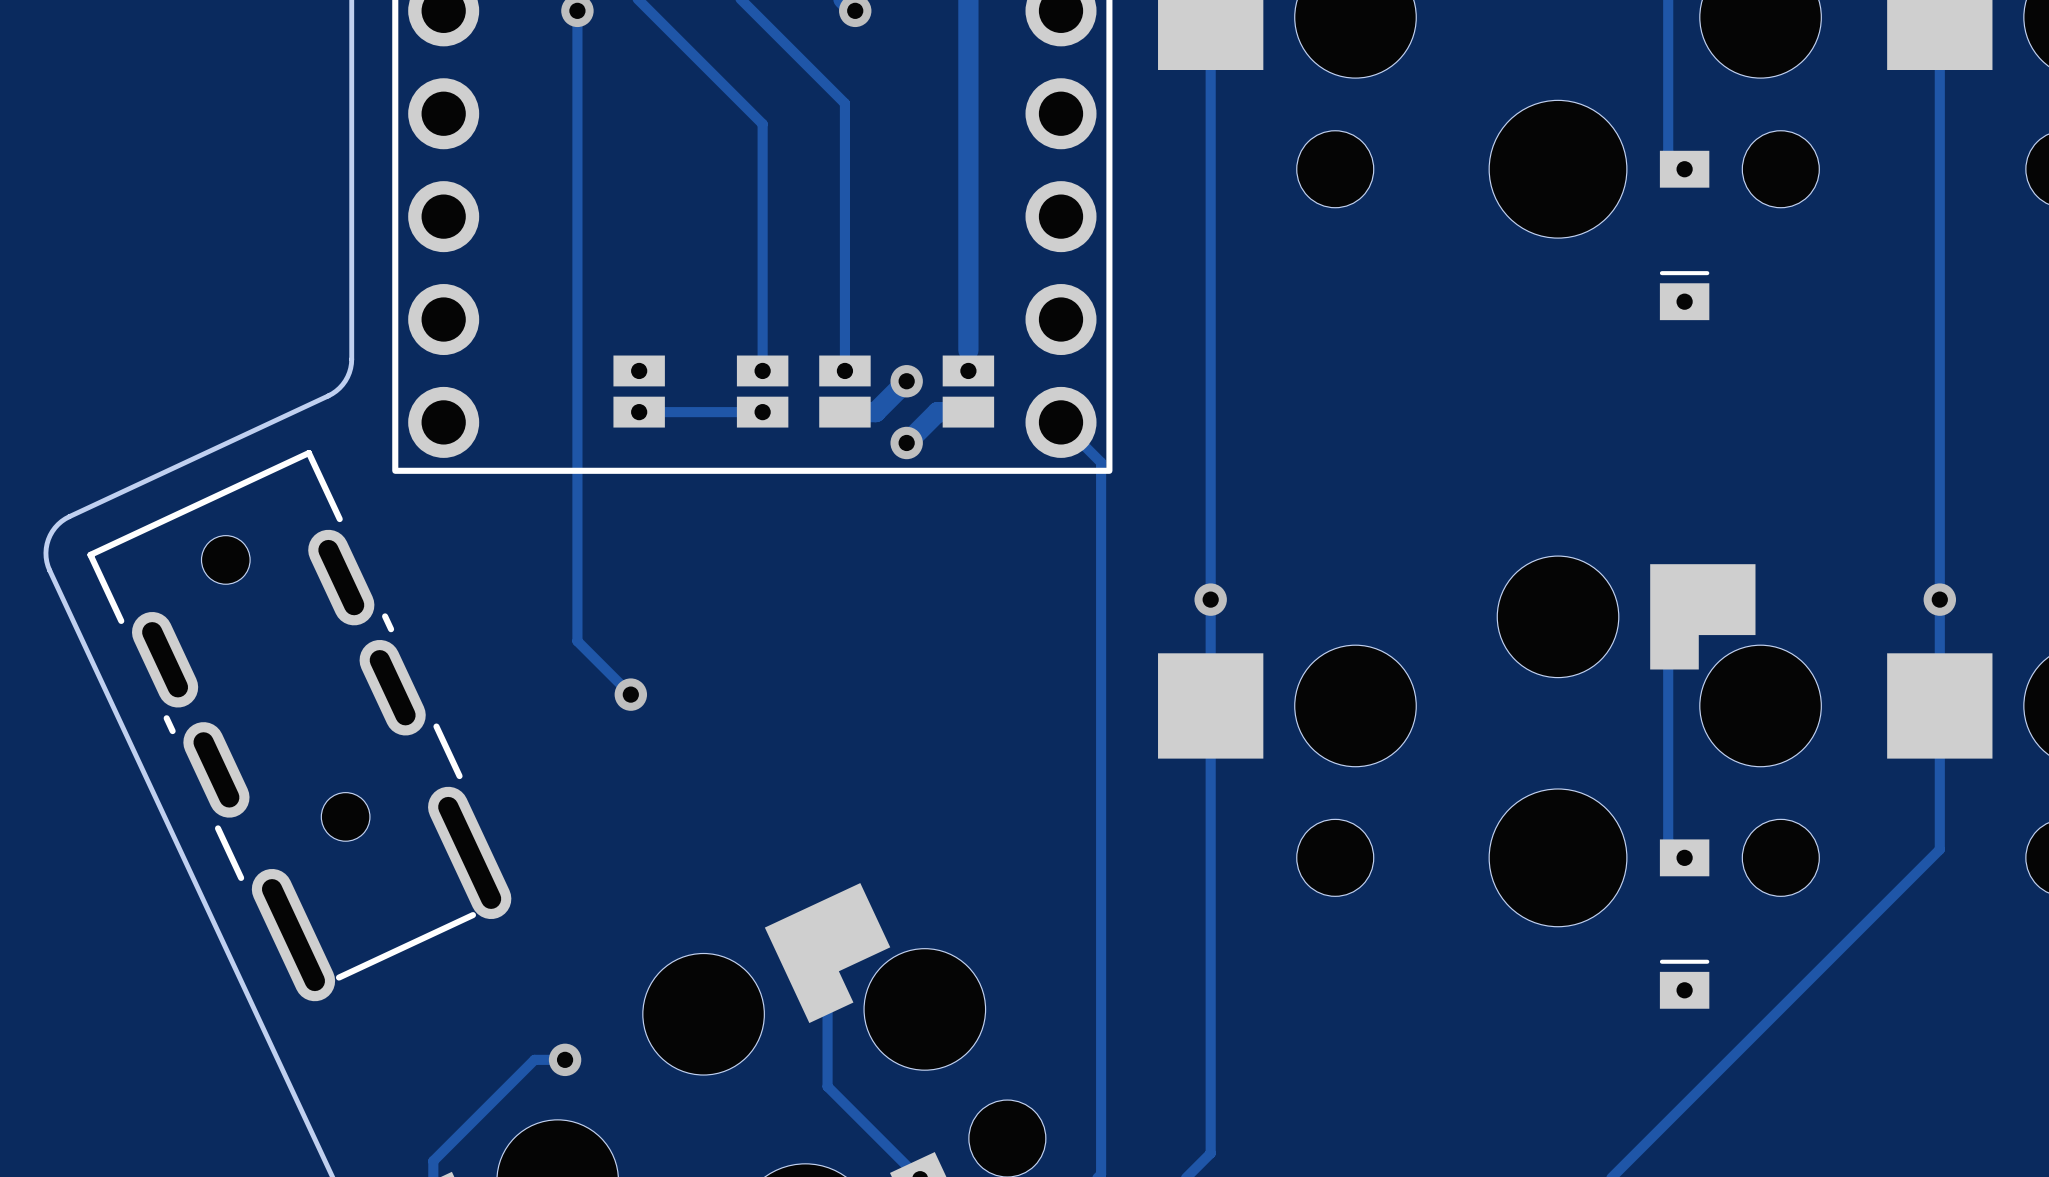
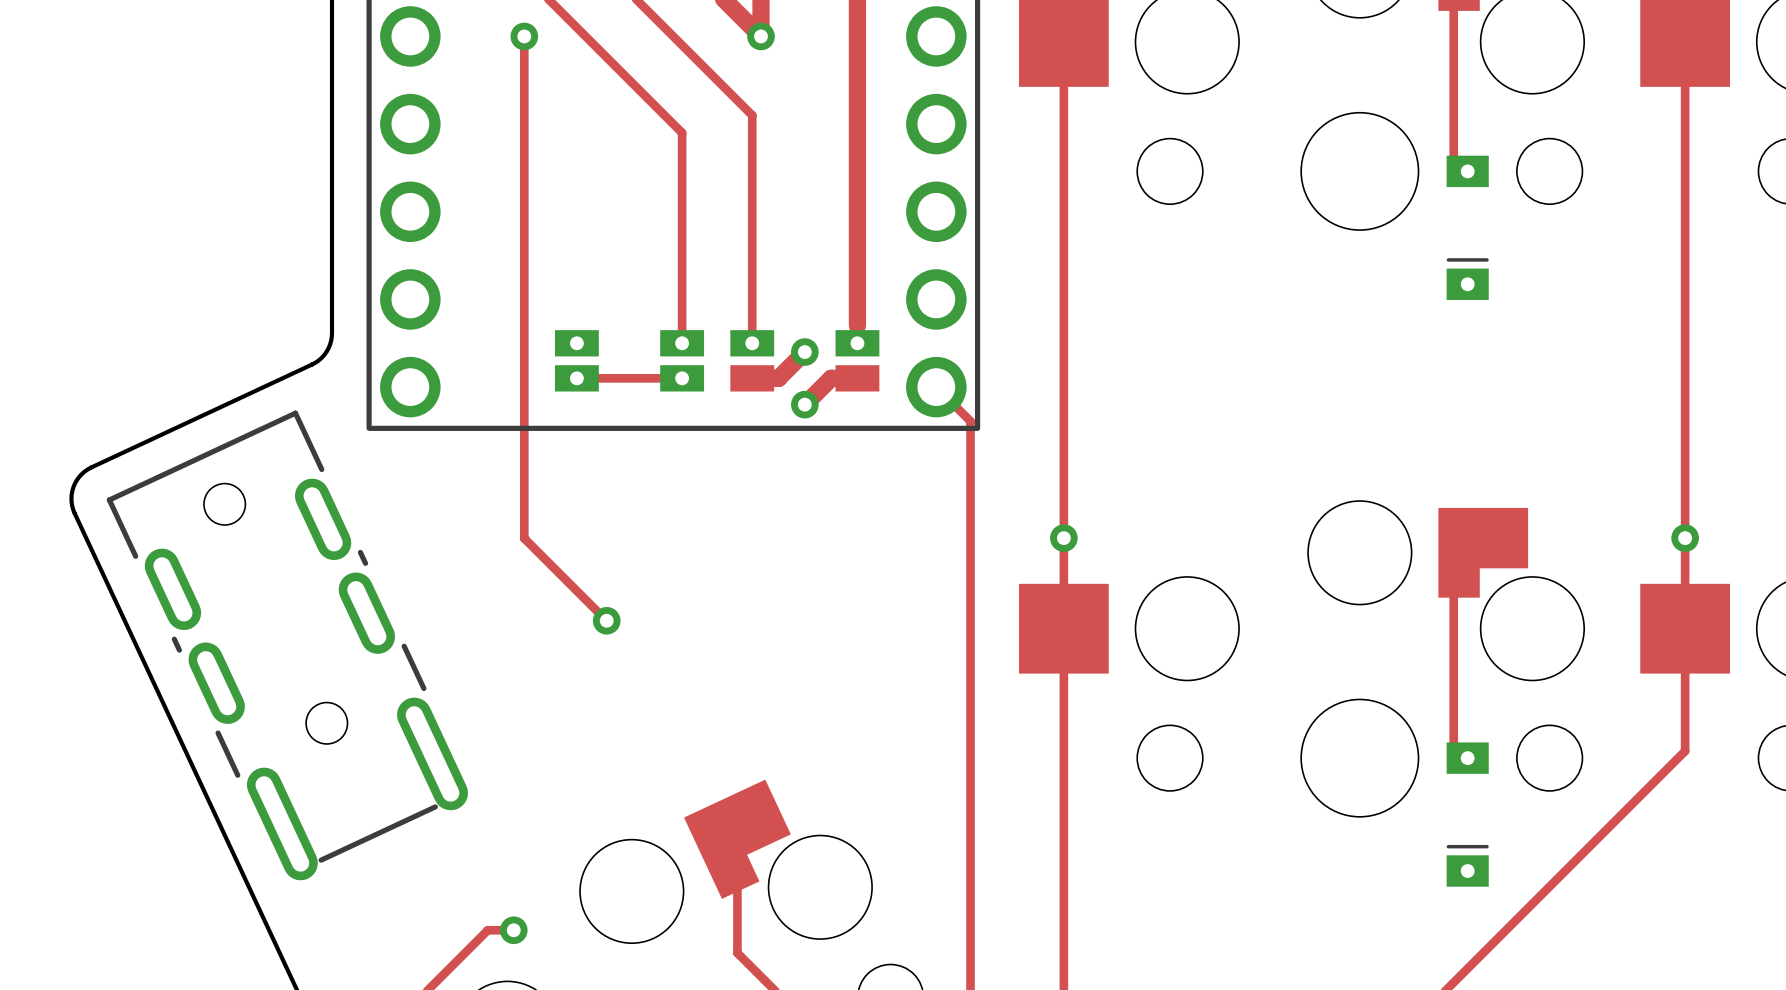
track: (577, 599) (577, 641) (630, 694) -> (524, 538) (606, 620)
via position: (630, 694) -> (606, 620)

